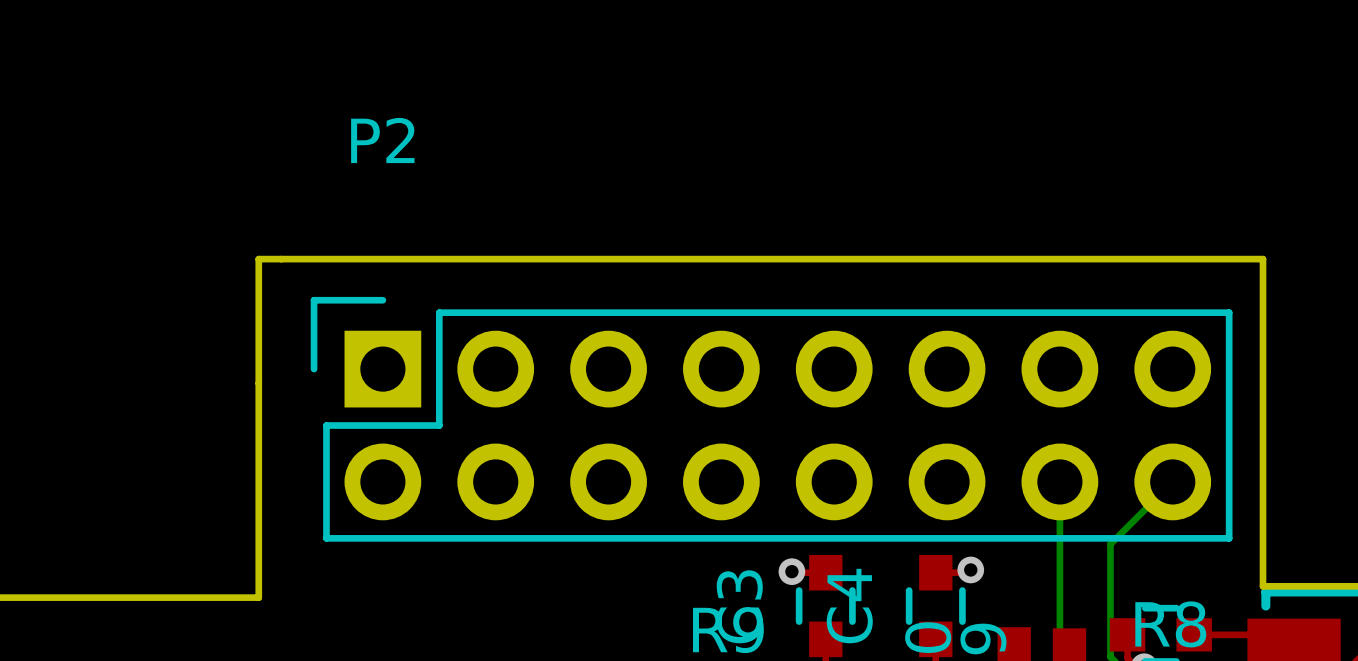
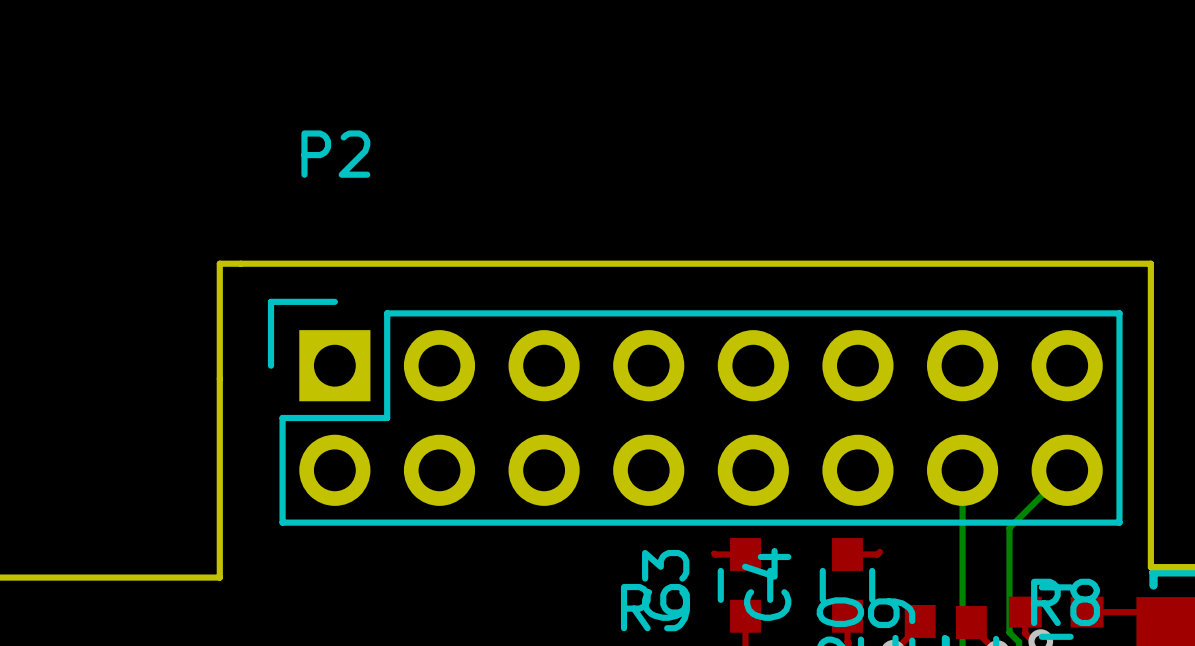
via: (970, 569) -> none
via: (791, 571) -> none

